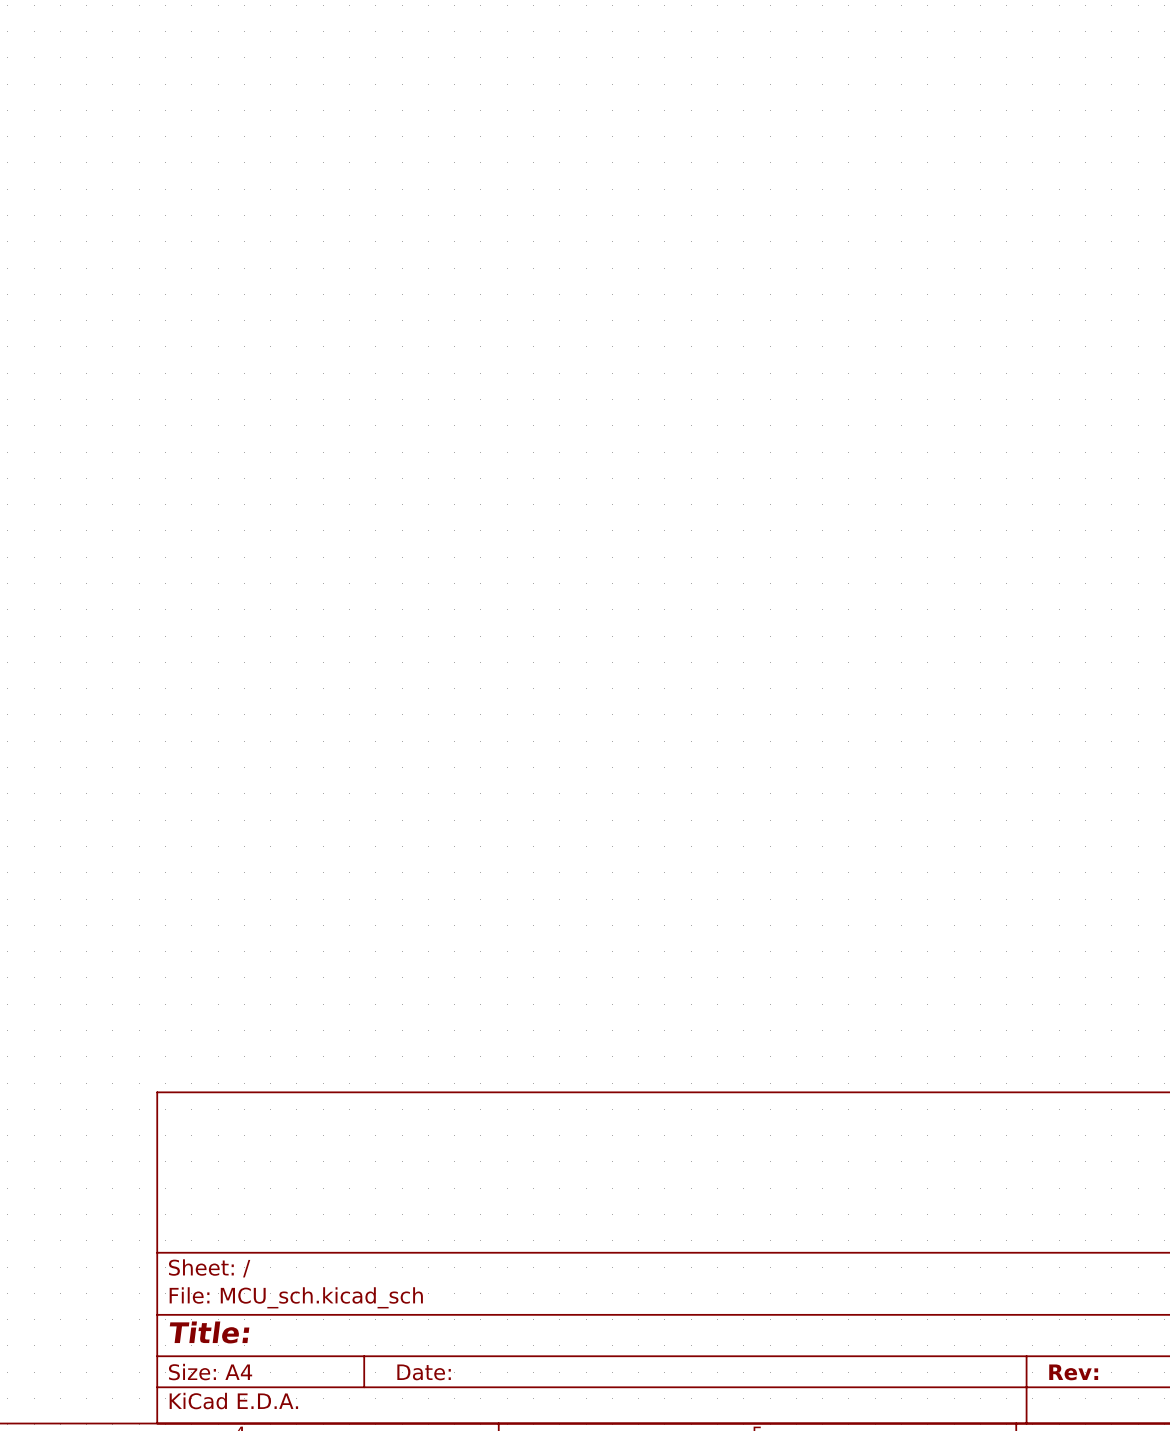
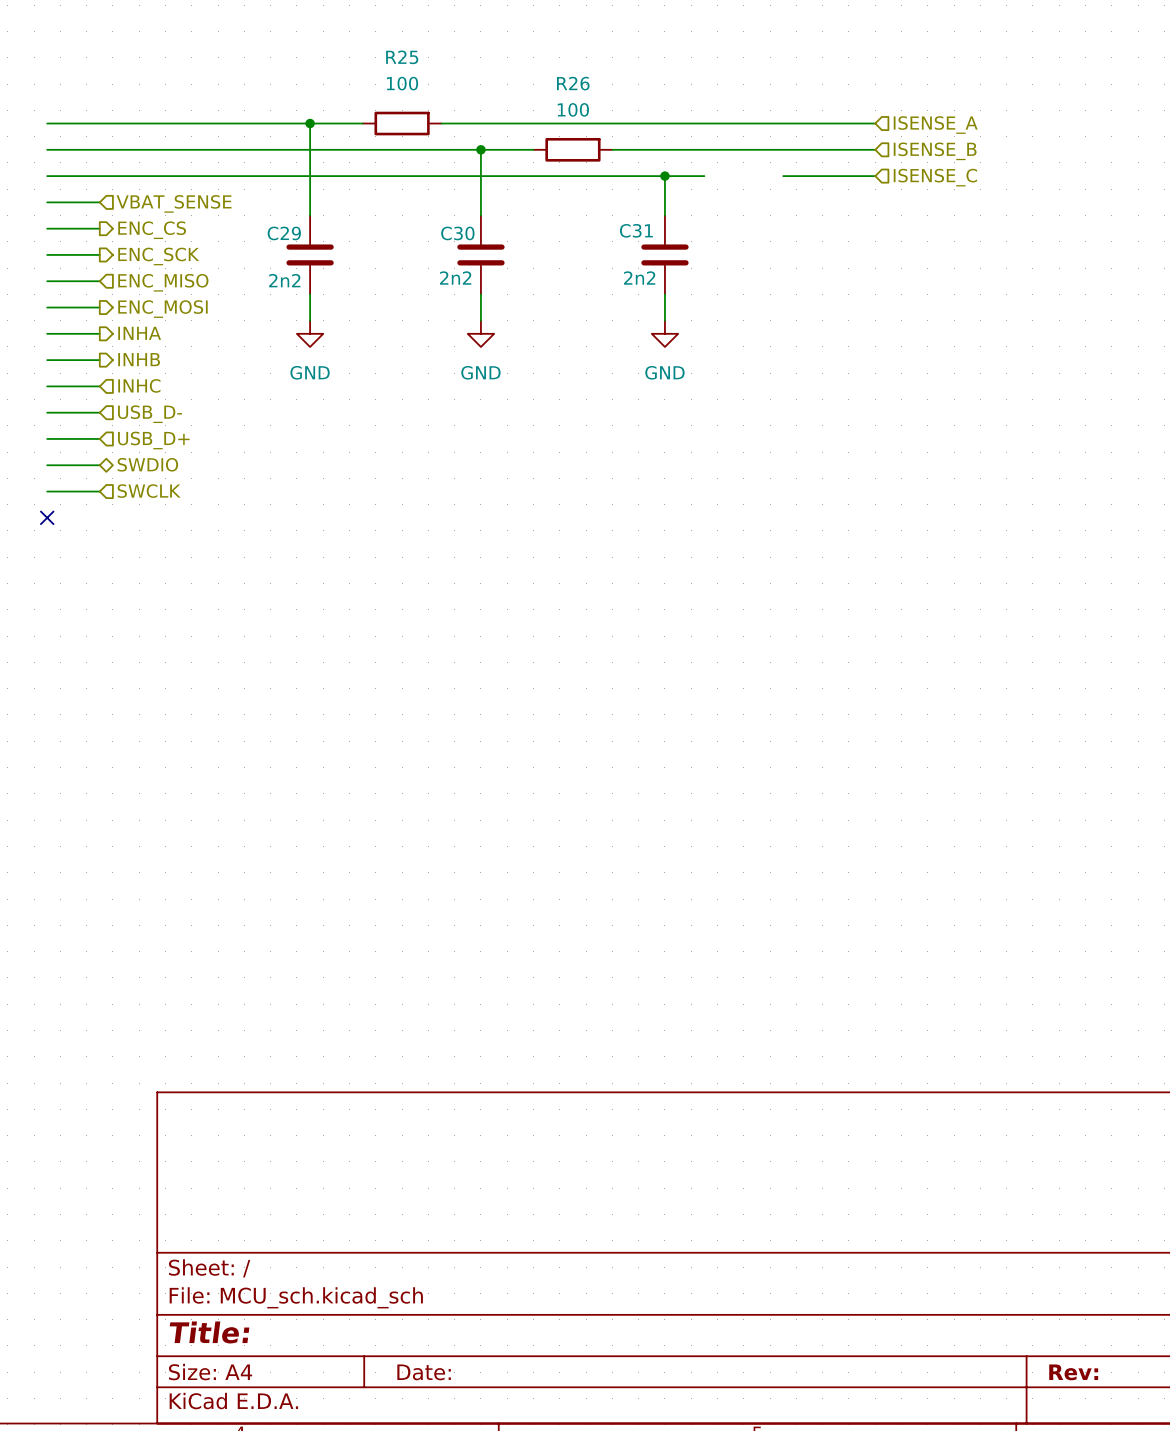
wire: none -> (47, 123) (362, 123)
wire: none -> (310, 123) (310, 215)
junction: none -> (310, 123)
R25: none -> 100 (402, 123)
wire: none -> (441, 123) (875, 123)
hierarchical label: none -> ISENSE_A (935, 125)
wire: none -> (47, 149) (533, 149)
wire: none -> (480, 149) (480, 215)
junction: none -> (480, 149)
R26: none -> 100 (572, 149)
wire: none -> (612, 149) (875, 149)
hierarchical label: none -> ISENSE_B (935, 151)
wire: none -> (47, 176) (704, 176)
wire: none -> (664, 176) (664, 215)
junction: none -> (664, 176)
wire: none -> (783, 176) (875, 176)
hierarchical label: none -> ISENSE_C (935, 177)
wire: none -> (47, 202) (99, 202)
hierarchical label: none -> VBAT_SENSE (174, 203)
wire: none -> (47, 228) (99, 228)
hierarchical label: none -> ENC_CS (152, 230)
wire: none -> (47, 254) (99, 254)
C29: none -> 2n2 (310, 254)
C30: none -> 2n2 (480, 254)
C31: none -> 2n2 (664, 254)
hierarchical label: none -> ENC_SCK (158, 256)
wire: none -> (47, 281) (99, 281)
hierarchical label: none -> ENC_MISO (163, 282)
wire: none -> (310, 294) (310, 320)
wire: none -> (480, 294) (480, 320)
wire: none -> (664, 294) (664, 320)
wire: none -> (47, 307) (99, 307)
hierarchical label: none -> ENC_MOSI (162, 309)
wire: none -> (47, 333) (99, 333)
hierarchical label: none -> INHA (139, 333)
power symbol: none -> GND (310, 333)
power symbol: none -> GND (480, 333)
power symbol: none -> GND (664, 333)
hierarchical label: none -> INHB (139, 359)
wire: none -> (47, 360) (99, 360)
hierarchical label: none -> INHC (139, 385)
wire: none -> (47, 386) (99, 386)
wire: none -> (47, 412) (99, 412)
hierarchical label: none -> USB_D- (150, 414)
wire: none -> (47, 438) (99, 438)
hierarchical label: none -> USB_D+ (153, 440)
hierarchical label: none -> SWDIO (147, 464)
wire: none -> (47, 465) (99, 465)
wire: none -> (47, 491) (99, 491)
hierarchical label: none -> SWCLK (149, 491)
no-connect mark: none -> (47, 517)

